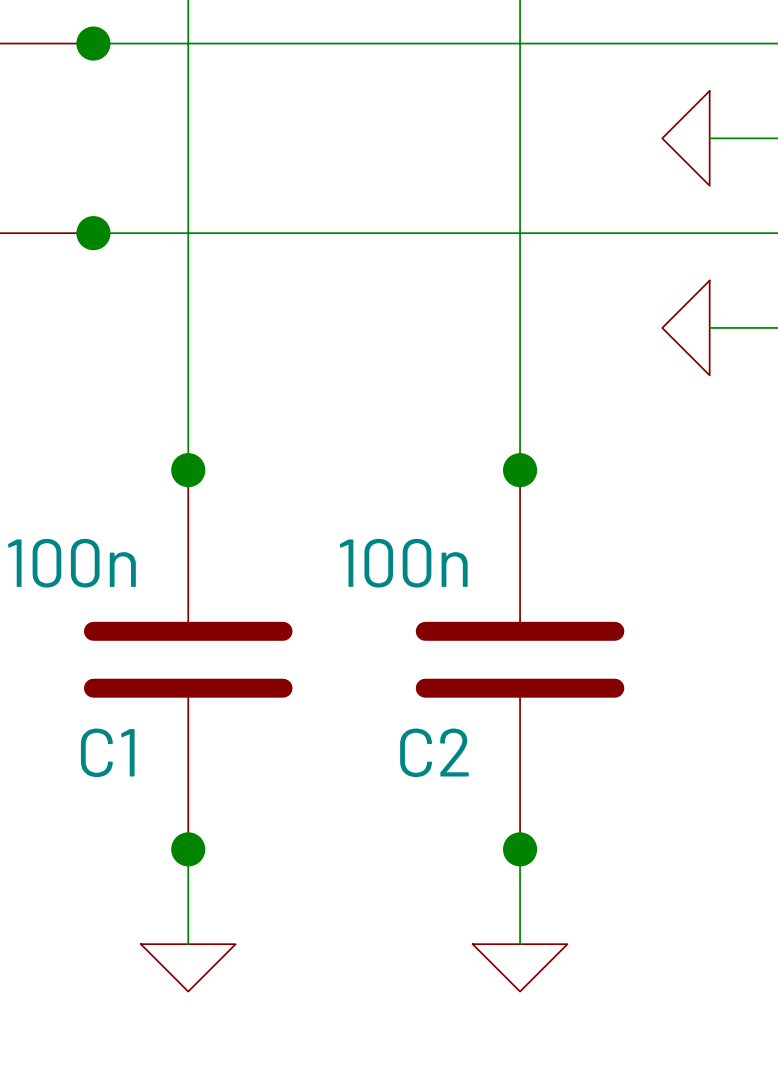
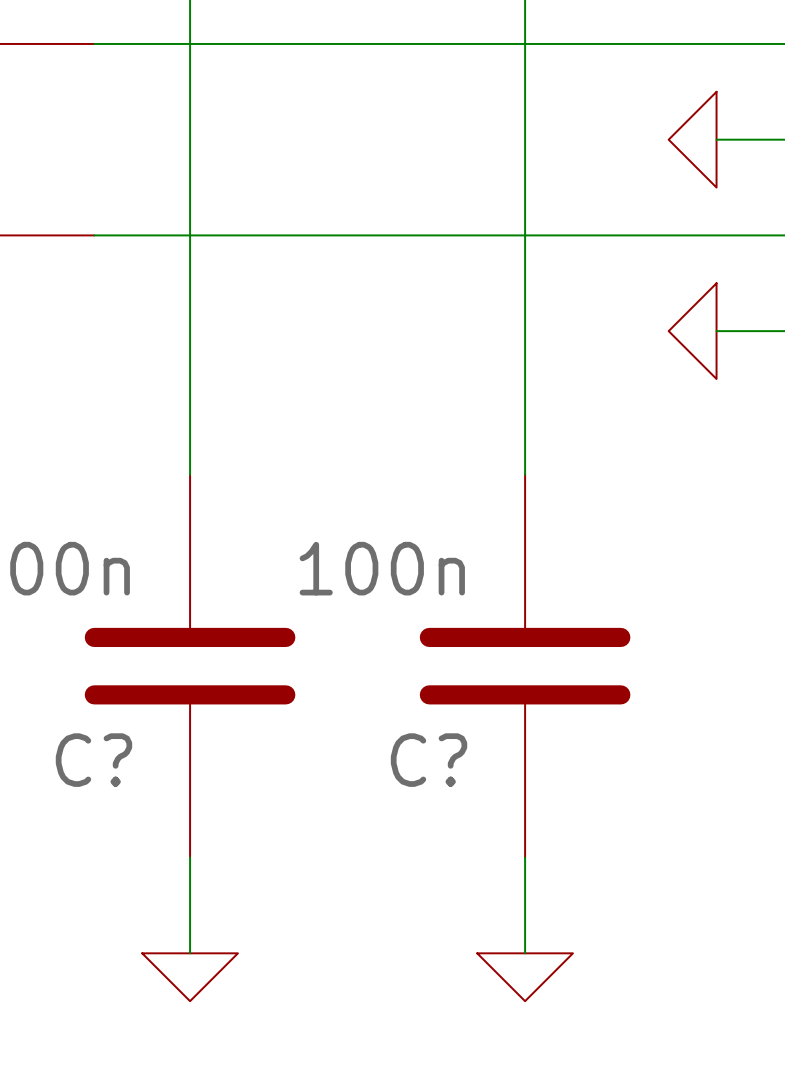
junction: (93, 43) -> none
junction: (93, 233) -> none
junction: (188, 470) -> none
junction: (520, 470) -> none
C1 name: C1 (107, 752) -> C? (93, 760)
C2 name: C2 (434, 752) -> C? (429, 760)
junction: (188, 849) -> none
junction: (520, 849) -> none

